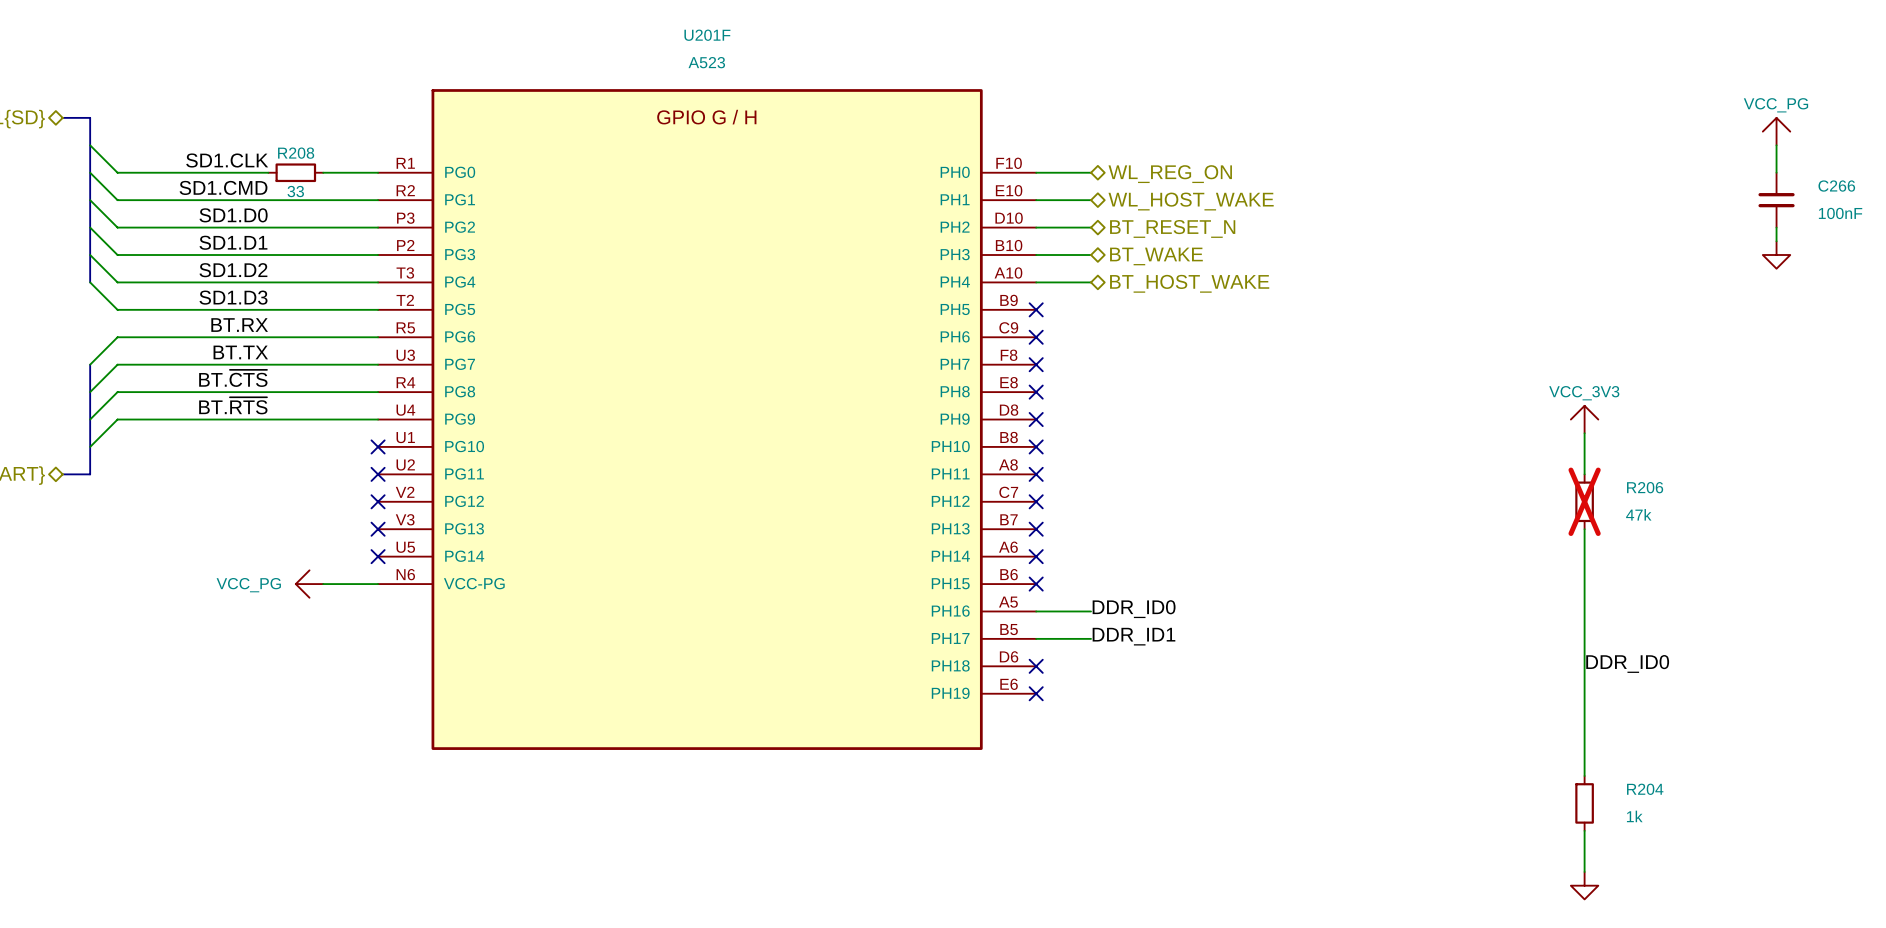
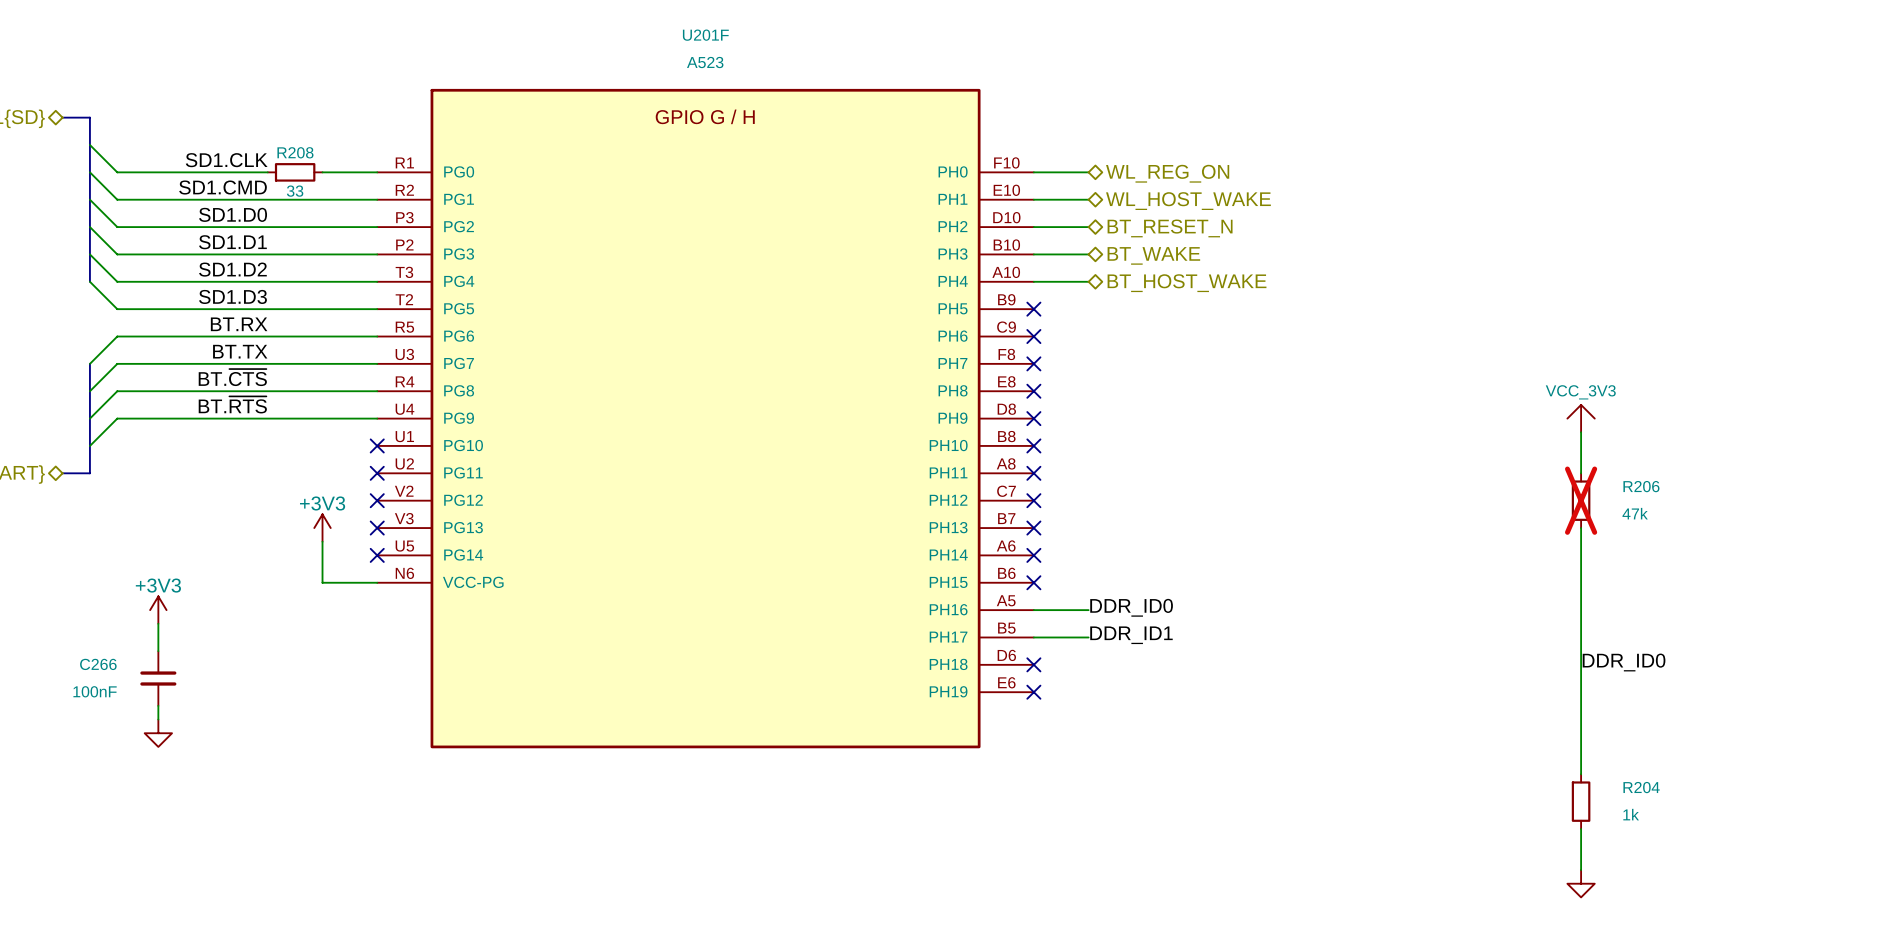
power symbol: VCC_PG (1776, 131) -> none
wire: (1776, 145) (1776, 172) -> none
C266 name position: C266 (1836, 186) -> C266 (98, 664)
C266 position: (1776, 200) -> (158, 678)
C266 value position: 100nF (1840, 213) -> 100nF (95, 691)
wire: (1776, 227) (1776, 241) -> none
power symbol: (1776, 255) -> none
power symbol: none -> +3V3 (322, 528)
wire: none -> (322, 541) (322, 582)
power symbol: VCC_PG (309, 584) -> none
power symbol: none -> +3V3 (158, 610)
wire: none -> (158, 623) (158, 651)
wire: none -> (158, 705) (158, 719)
power symbol: none -> (158, 733)

